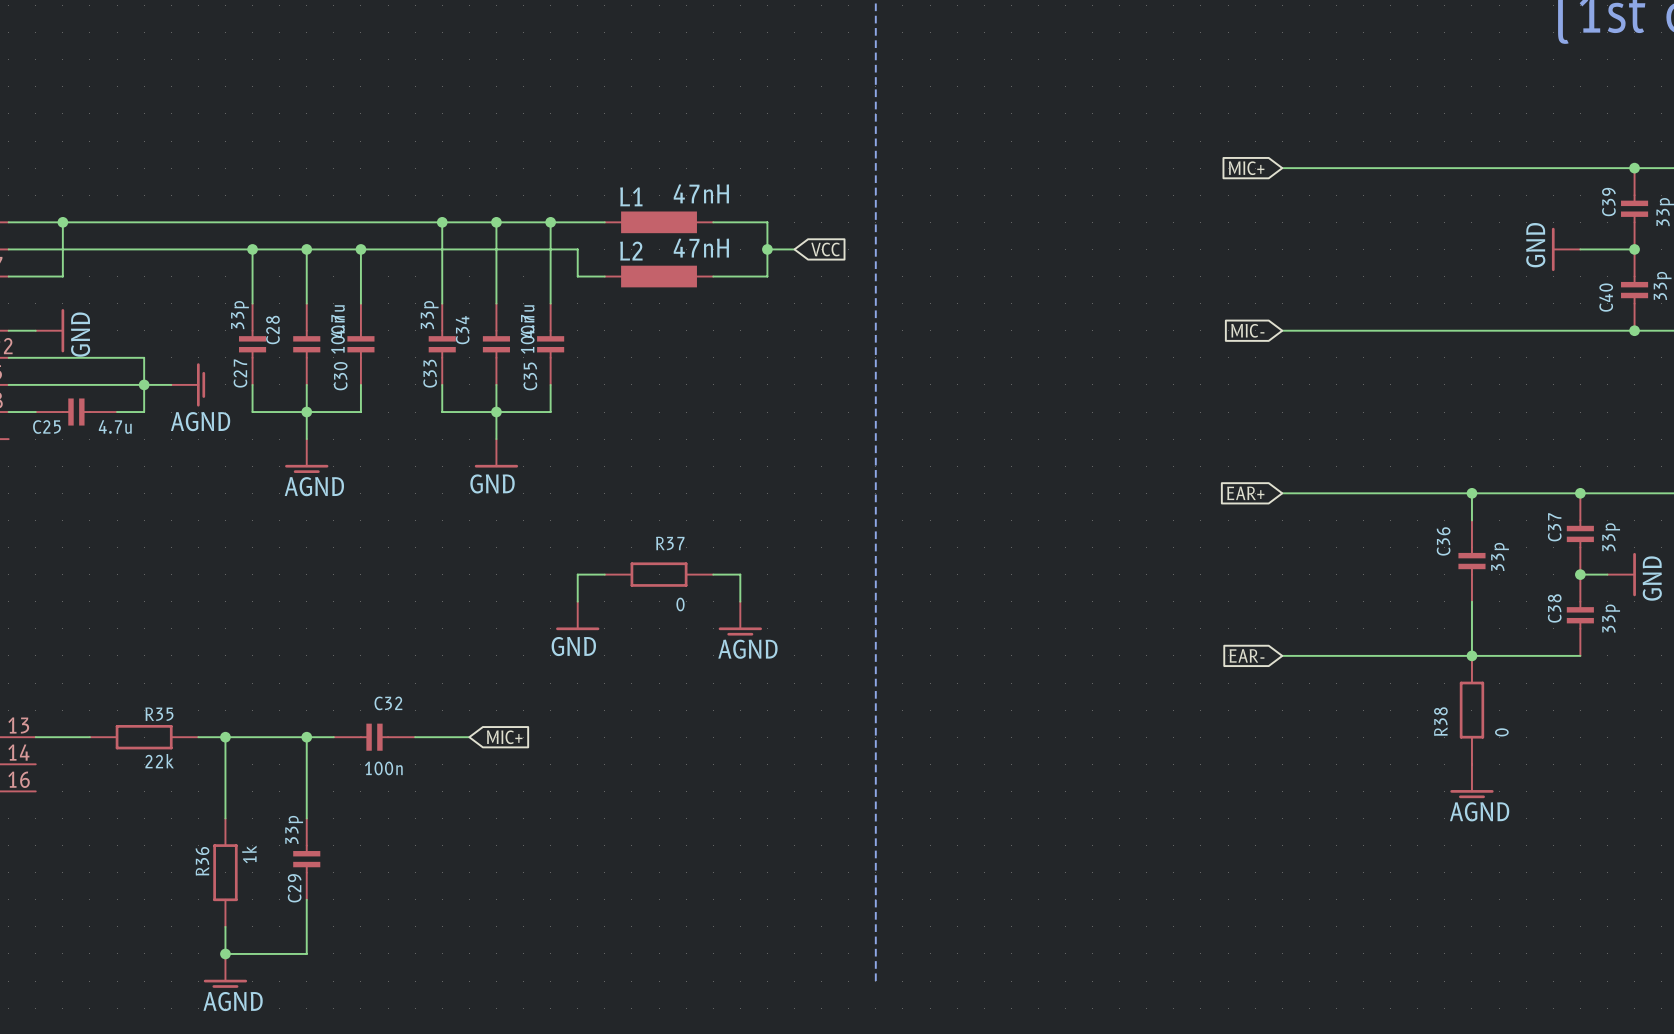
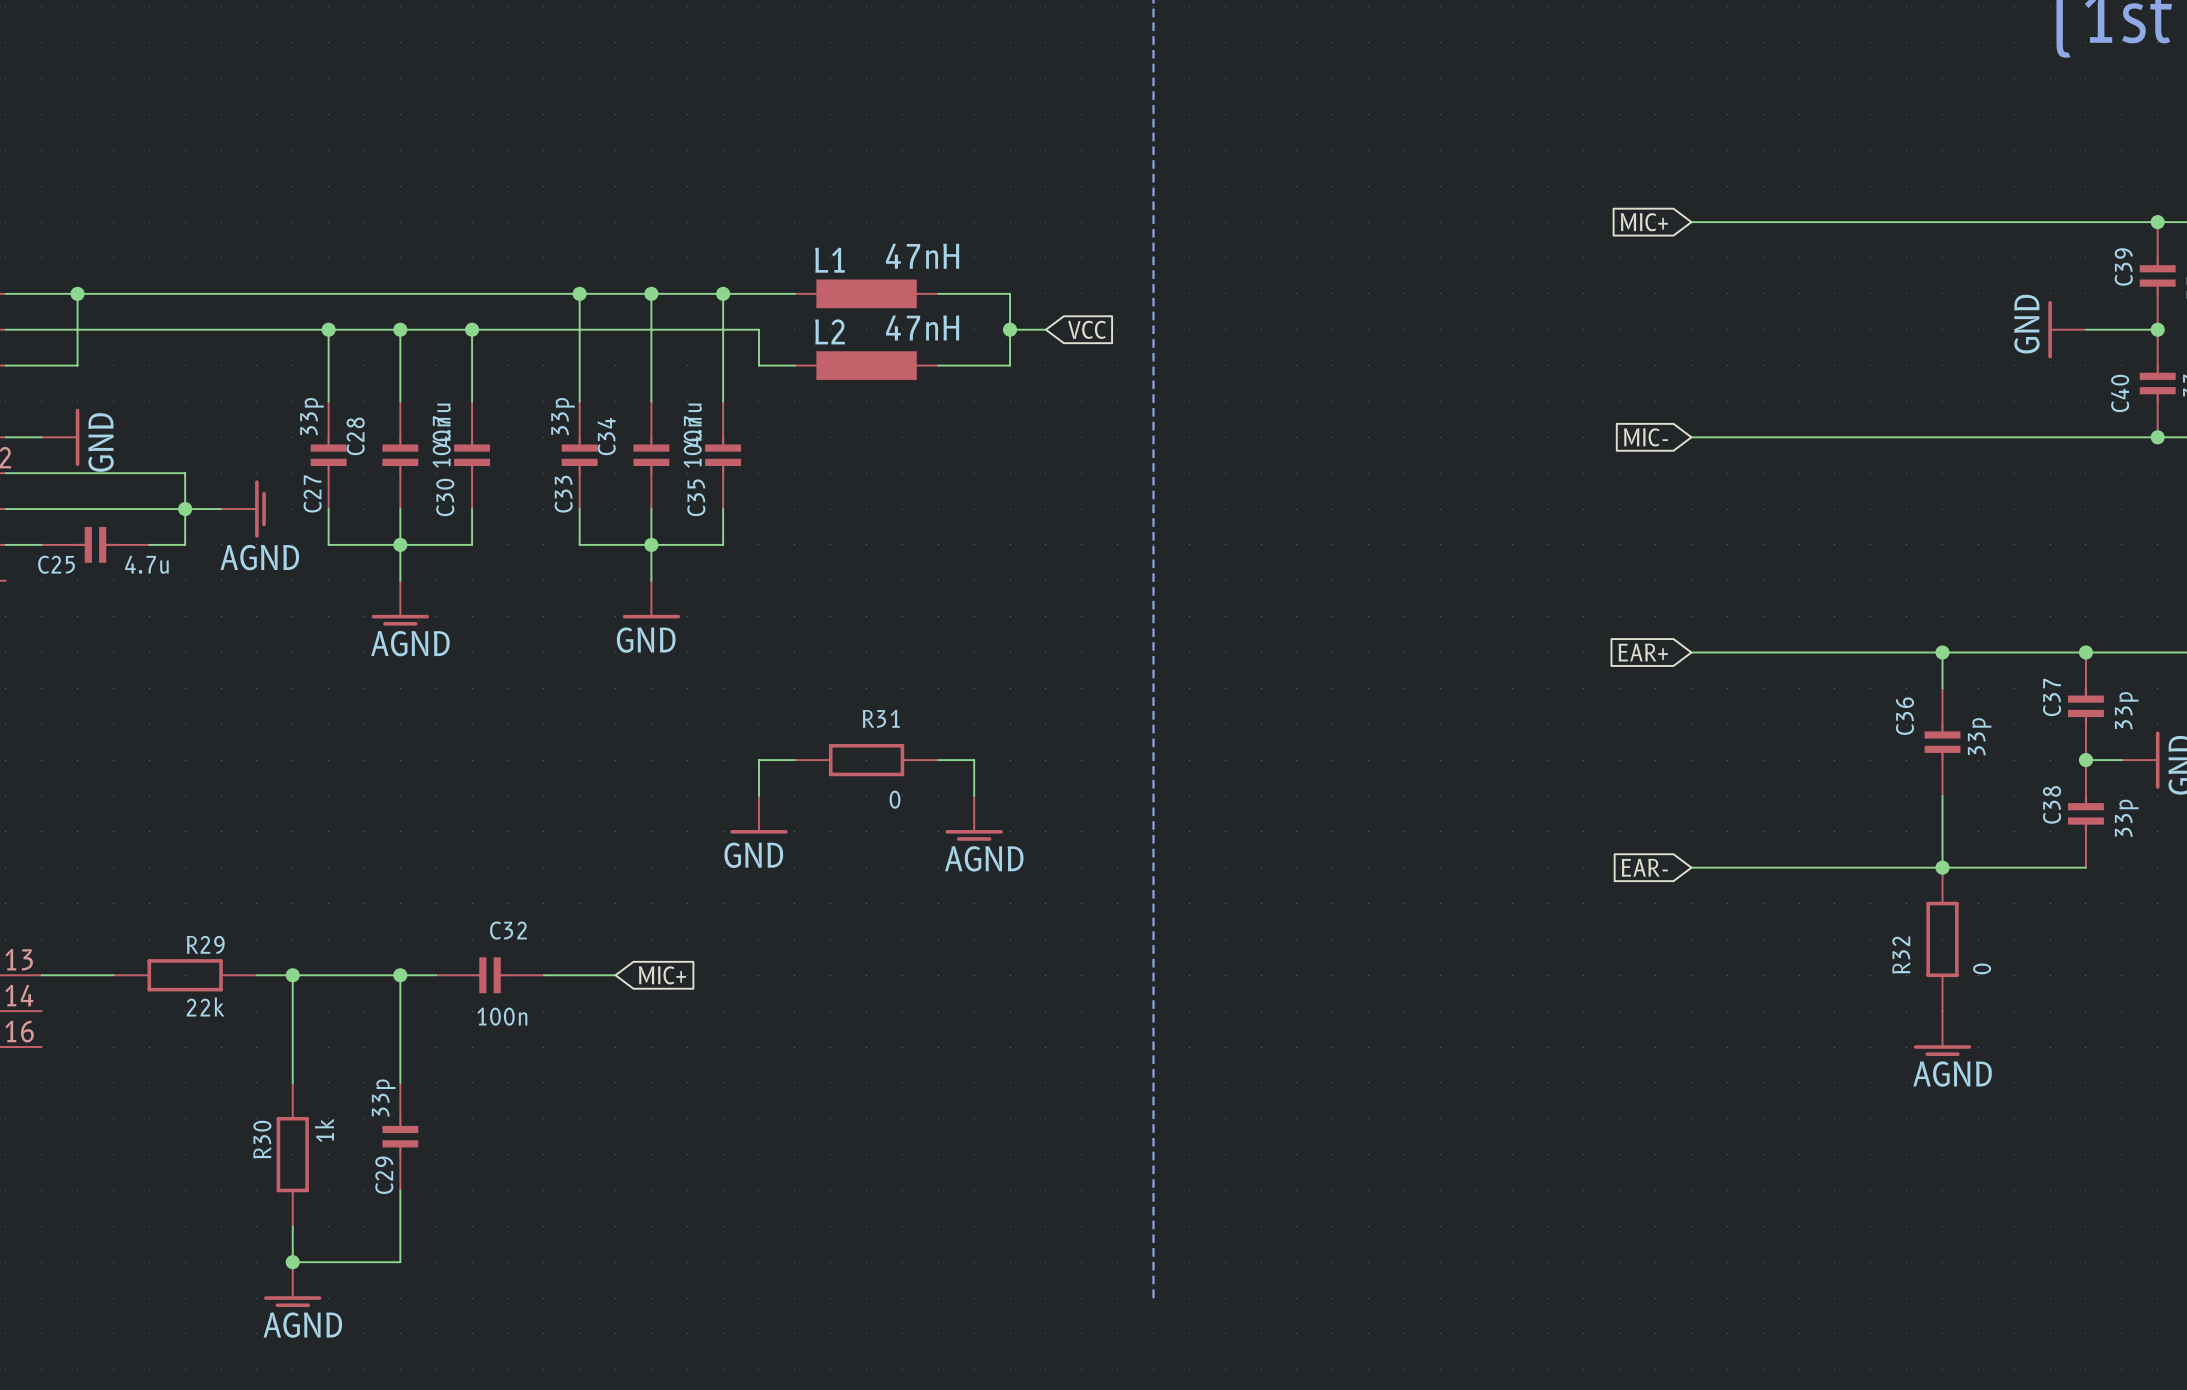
R37 name: R37 (670, 543) -> R31 (881, 718)
R35 name: R35 (159, 714) -> R29 (205, 944)
R38 name: R38 (1440, 721) -> R32 (1901, 955)
R36 name: R36 (202, 861) -> R30 (262, 1139)

